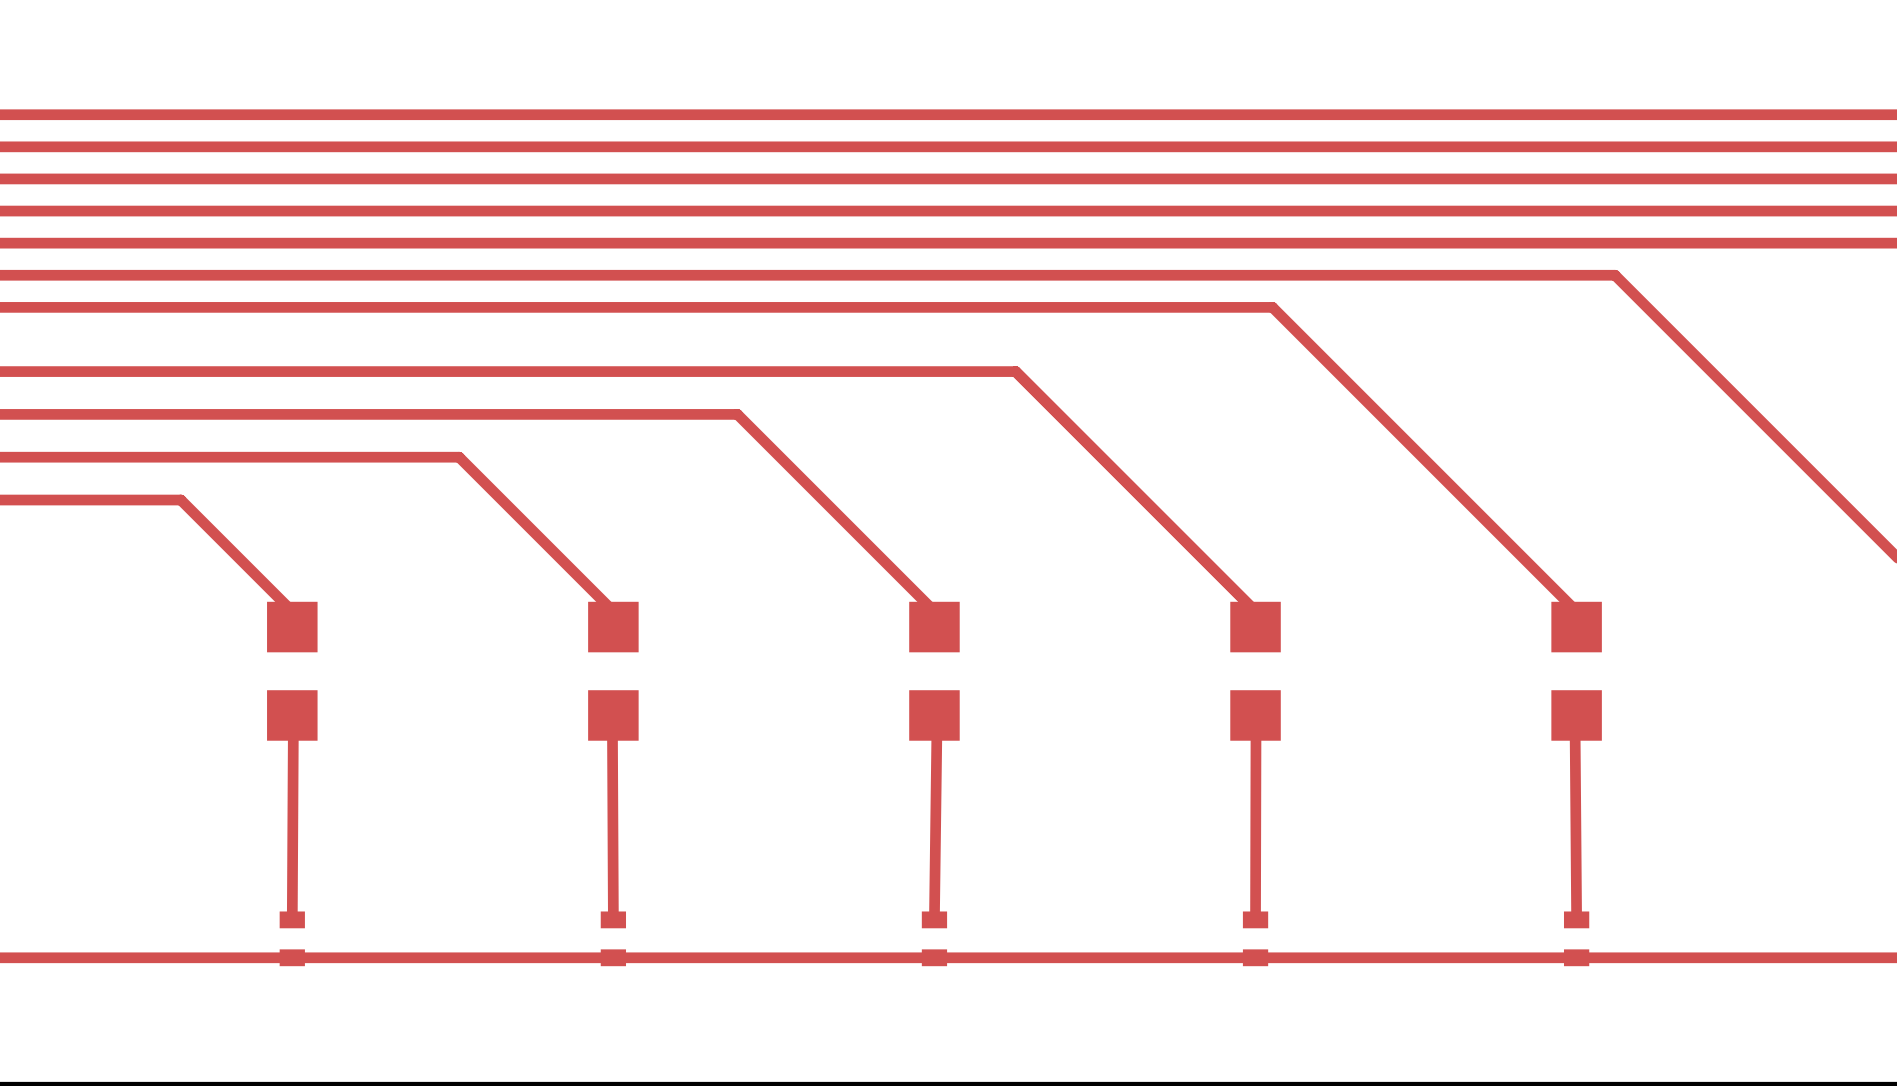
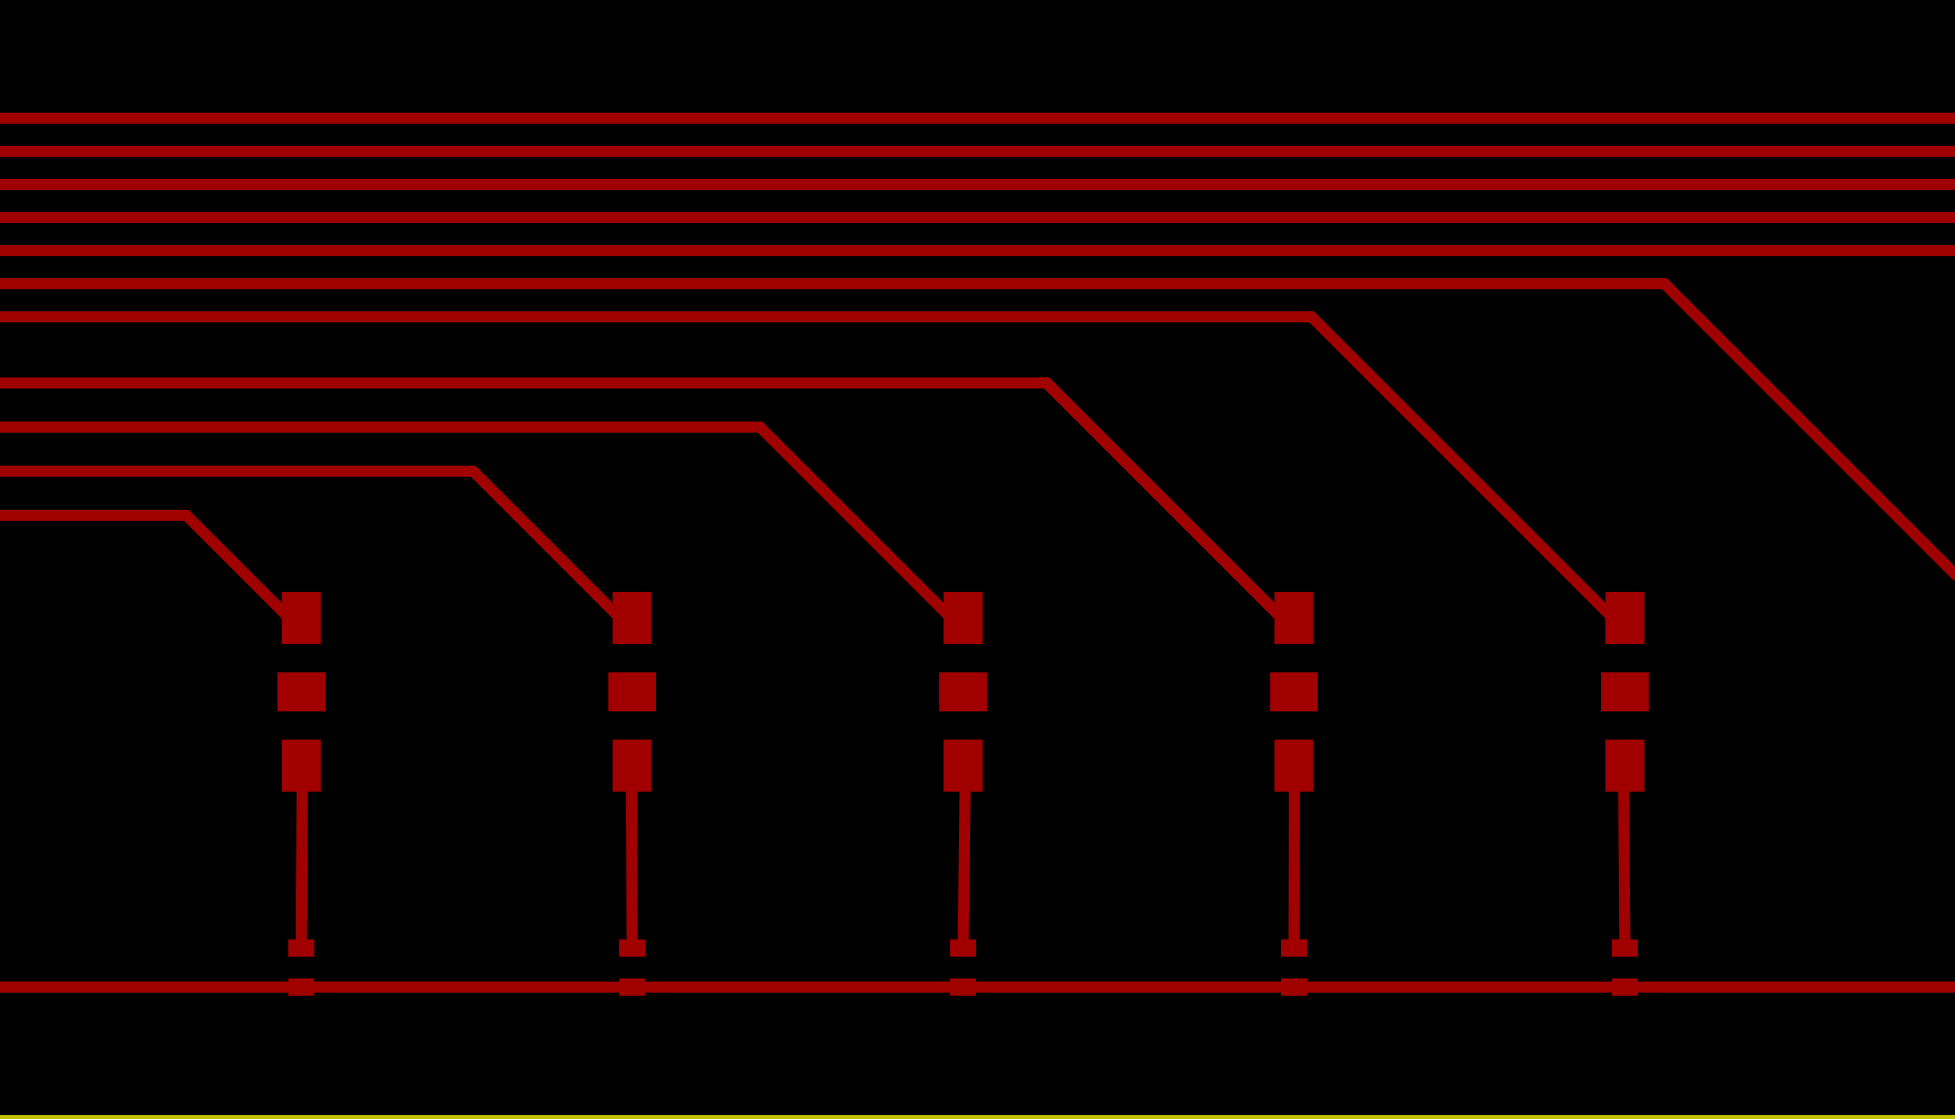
part footprint: [267, 601, 318, 741] -> [277, 591, 326, 792]
part footprint: [588, 601, 639, 741] -> [608, 591, 657, 792]
part footprint: [909, 601, 960, 741] -> [939, 591, 987, 792]
part footprint: [1230, 601, 1281, 741] -> [1270, 591, 1318, 792]
part footprint: [1551, 601, 1602, 741] -> [1601, 591, 1649, 792]

